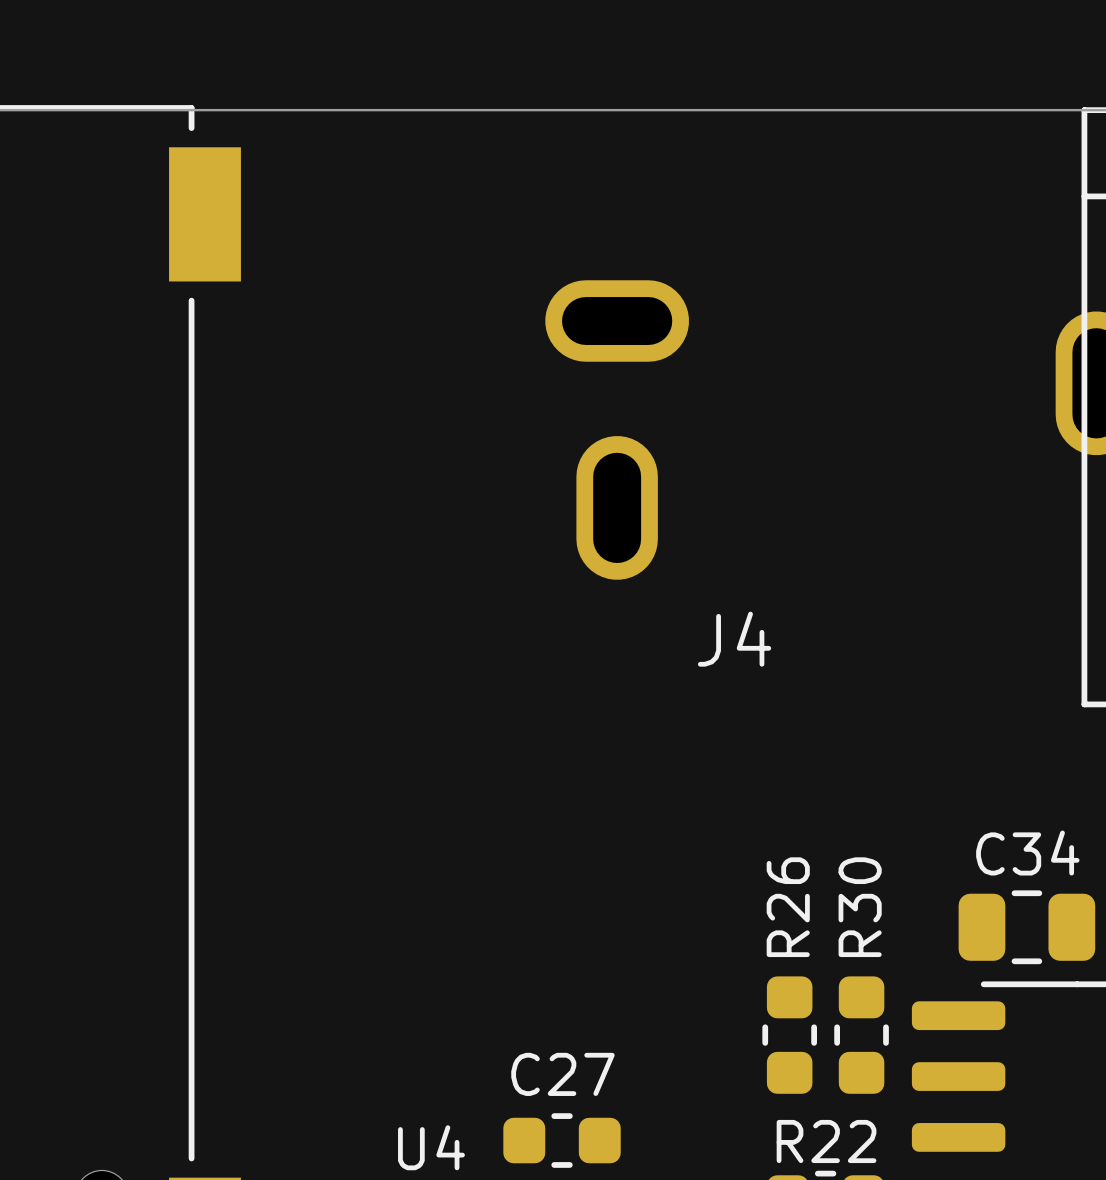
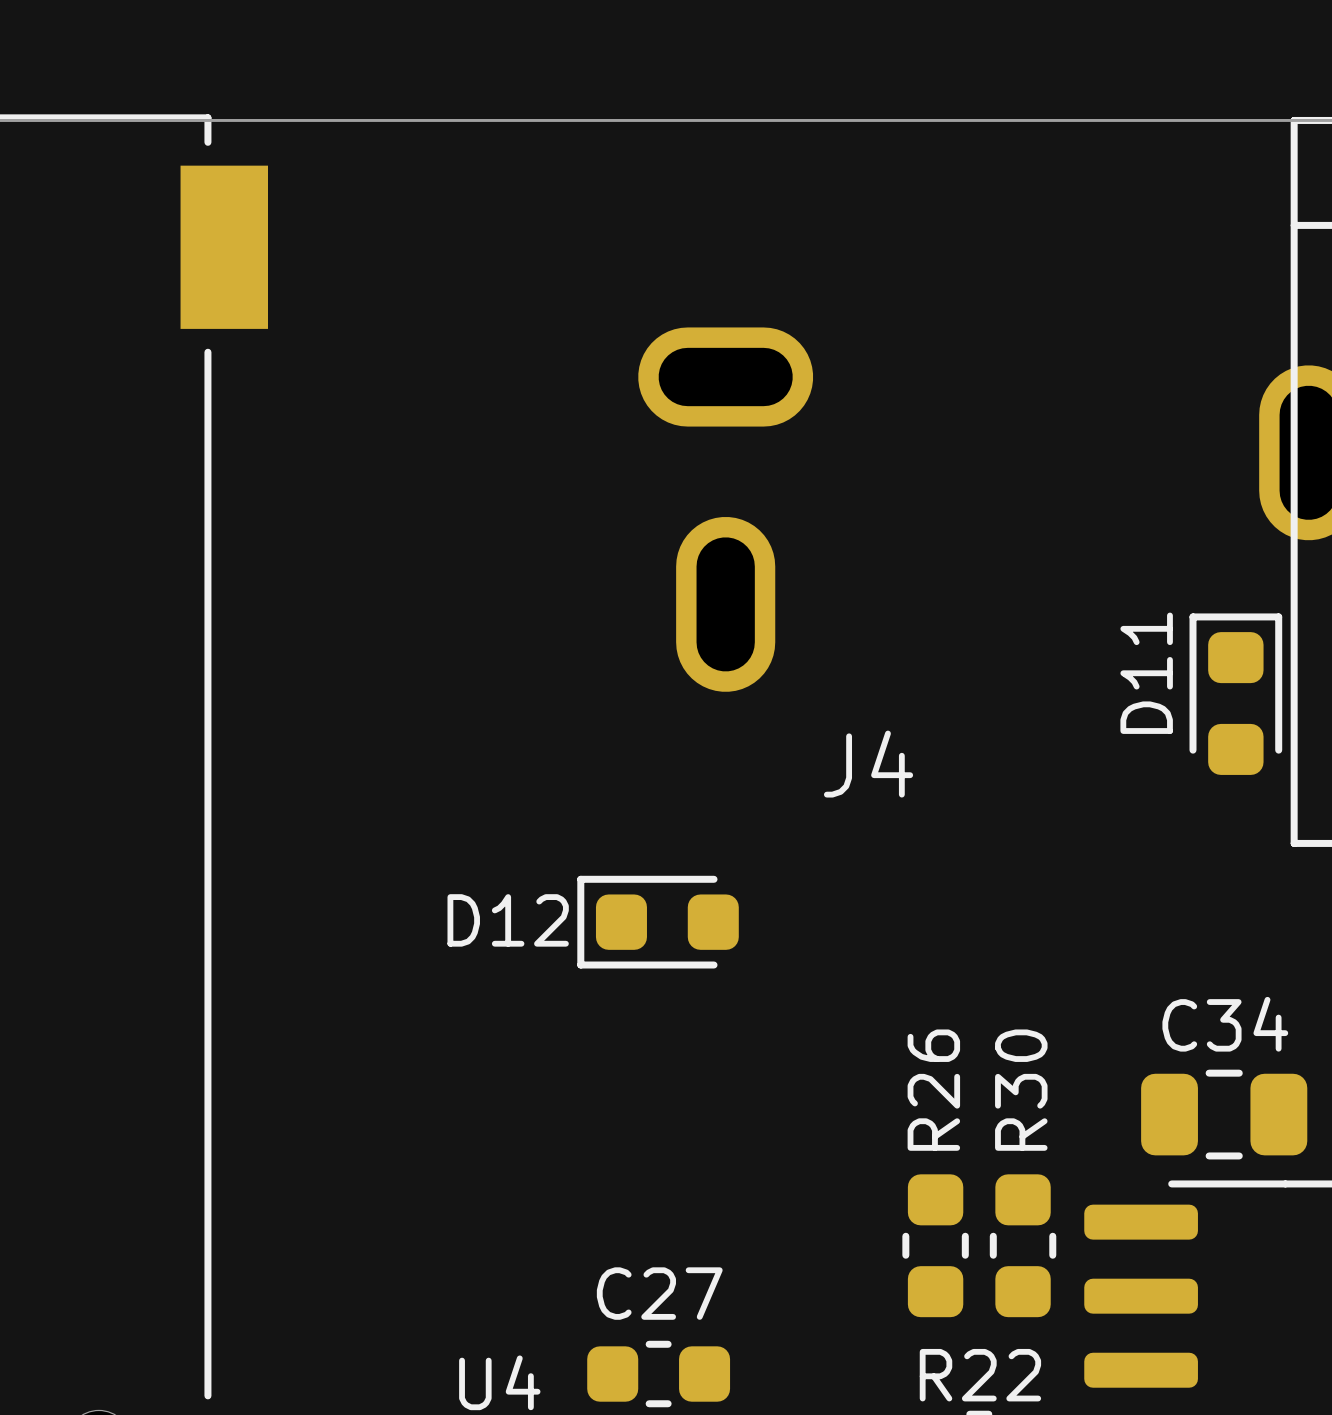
D11: none -> (1235, 694)
D12: none -> (658, 922)

